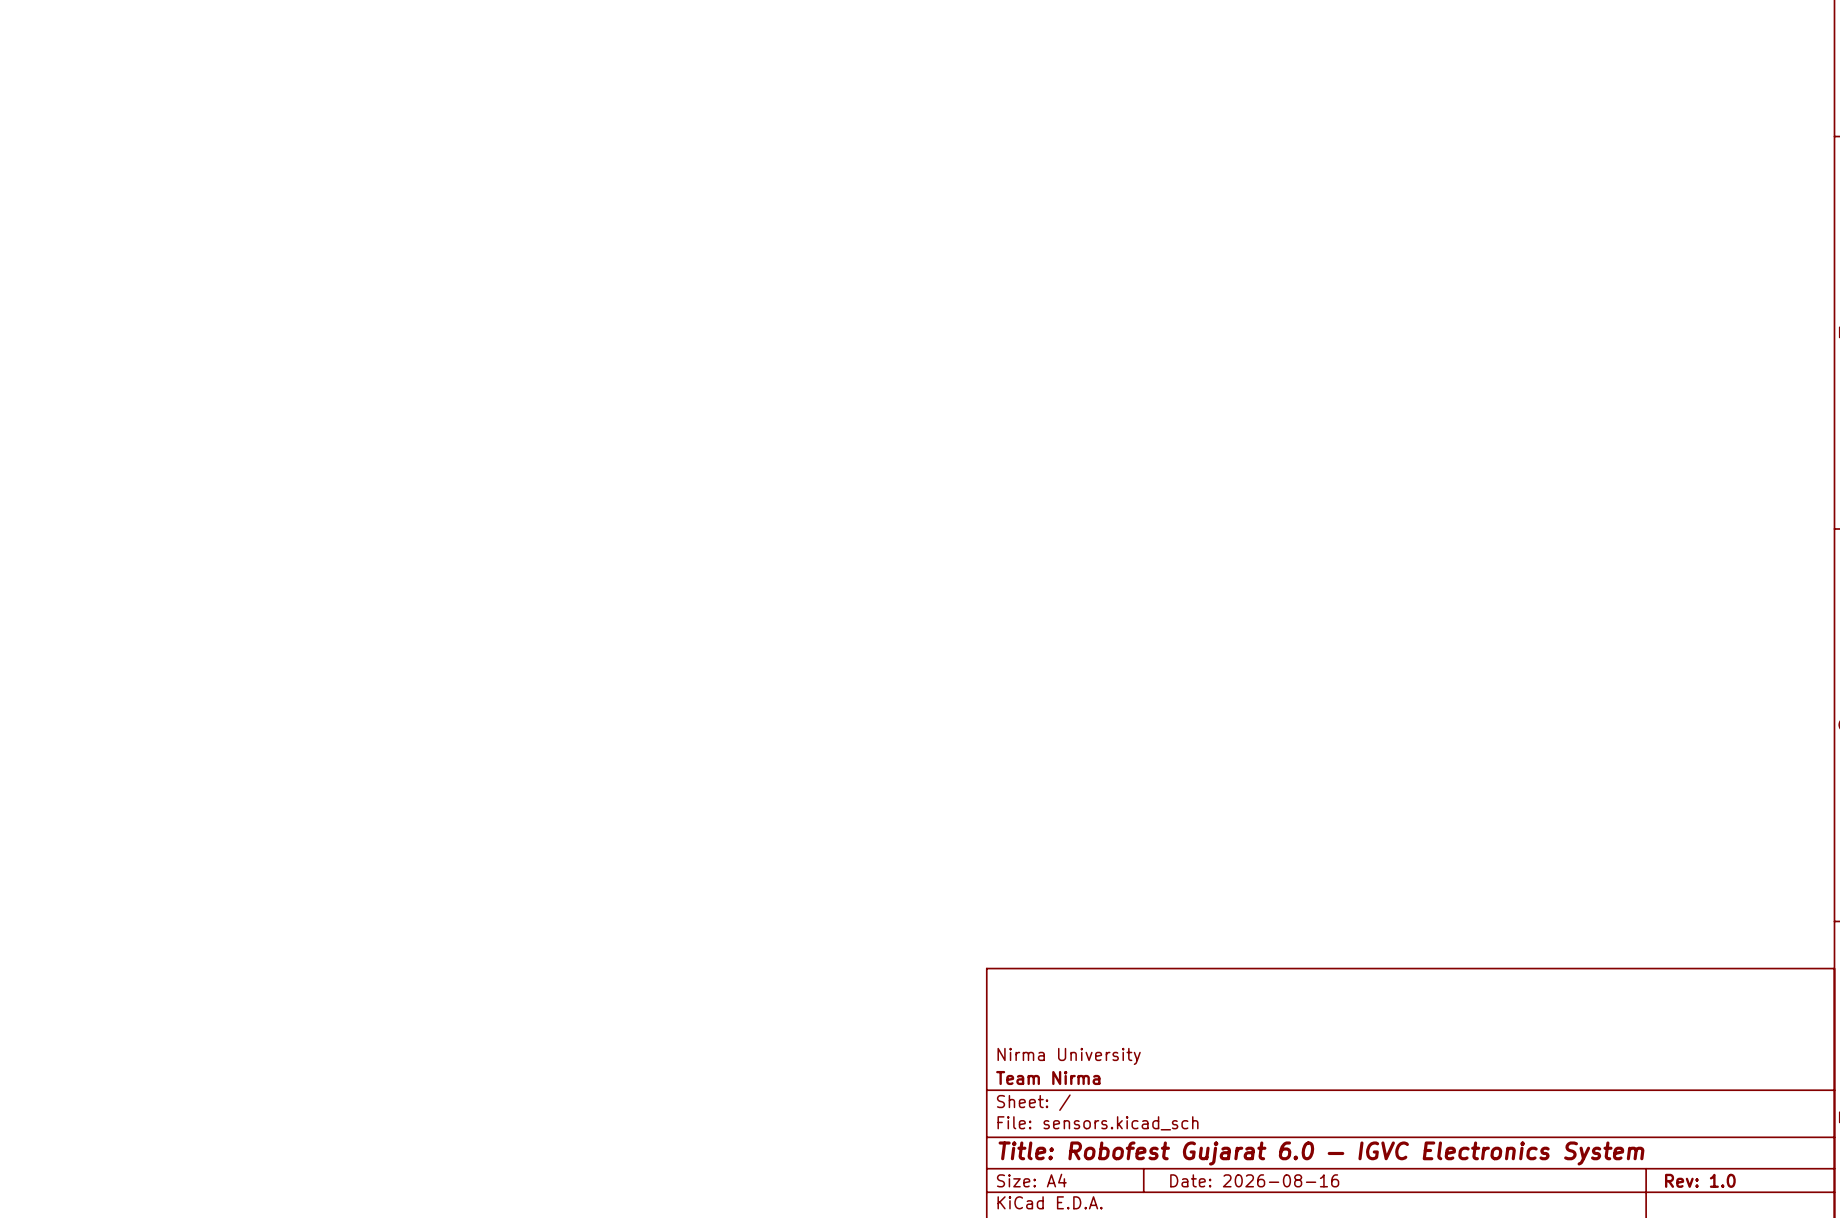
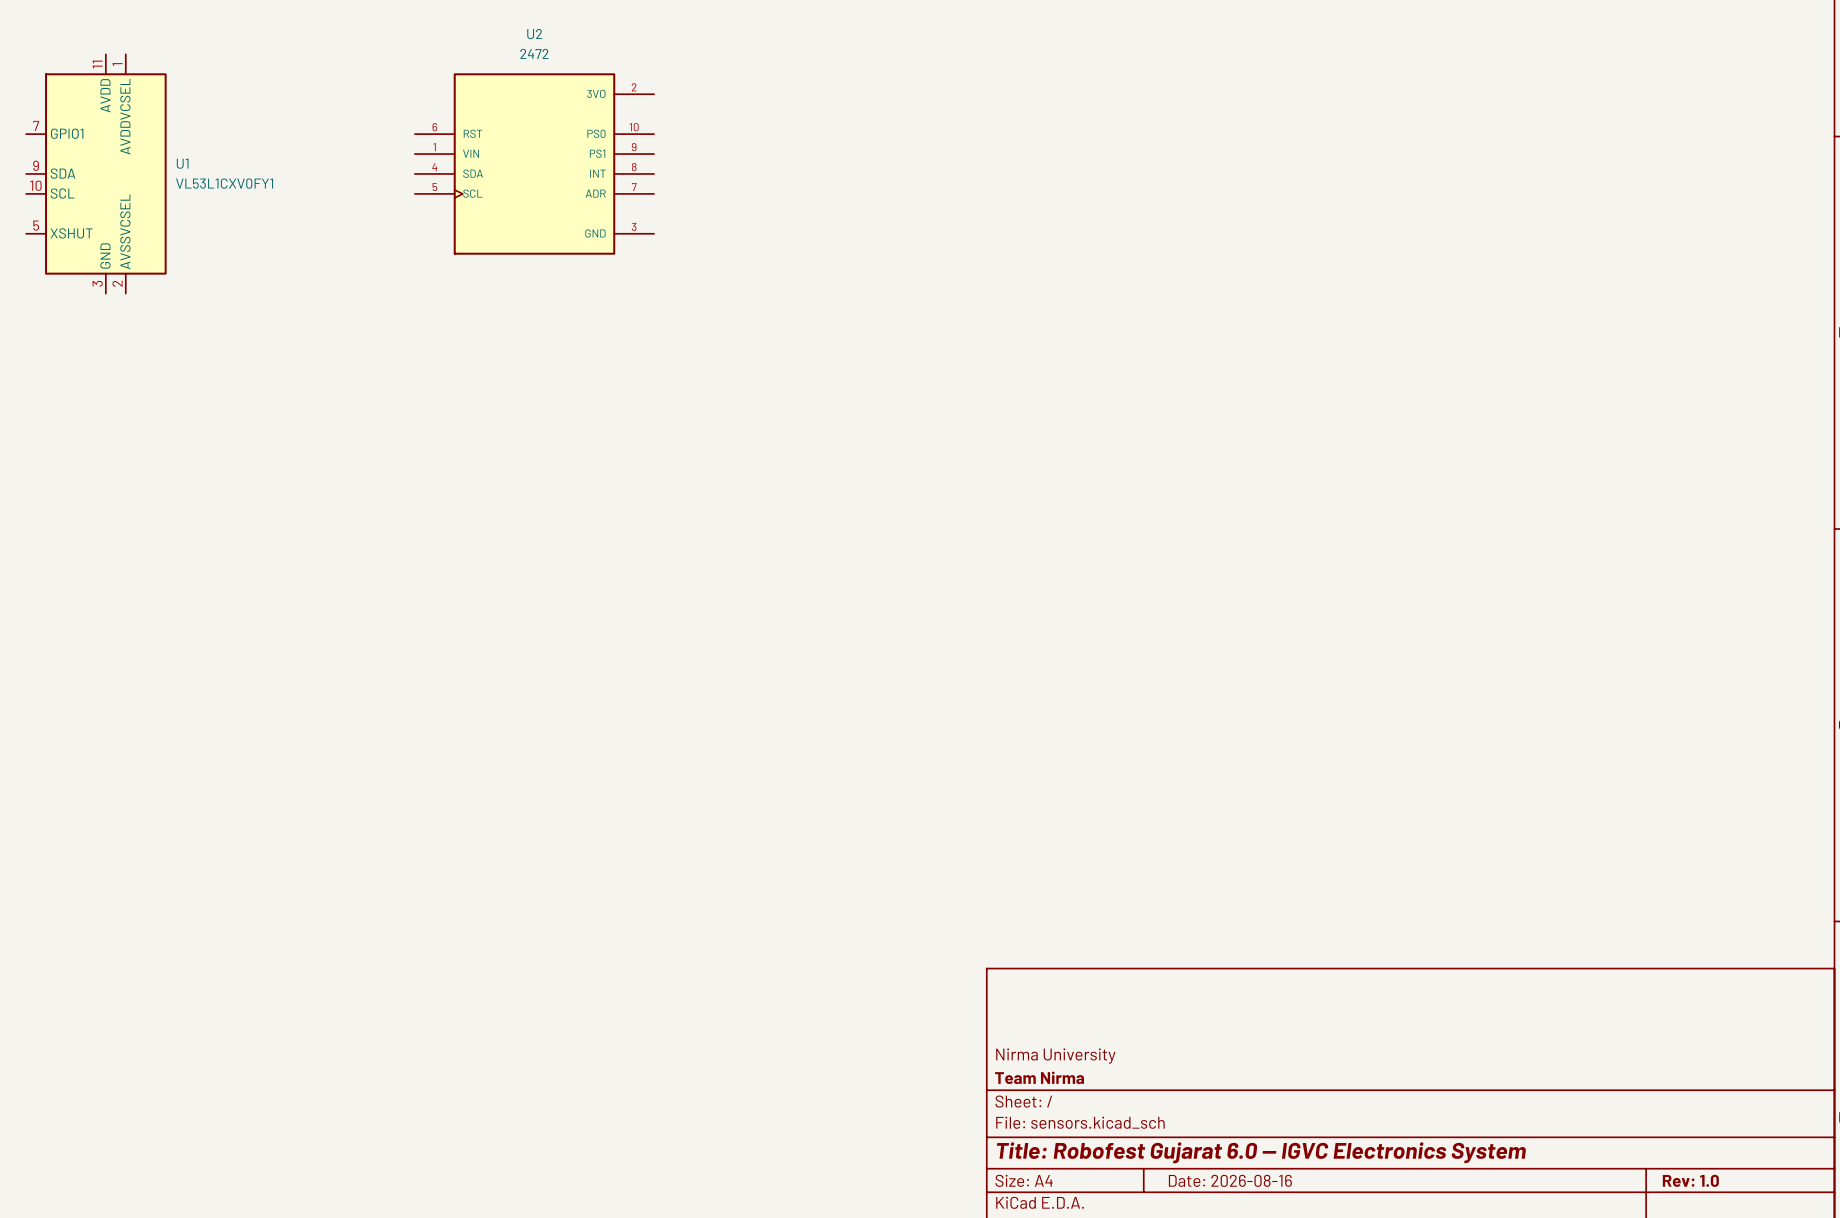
U2: none -> 2472 (534, 164)
U1: none -> VL53L1CXV0FY1 (96, 173)

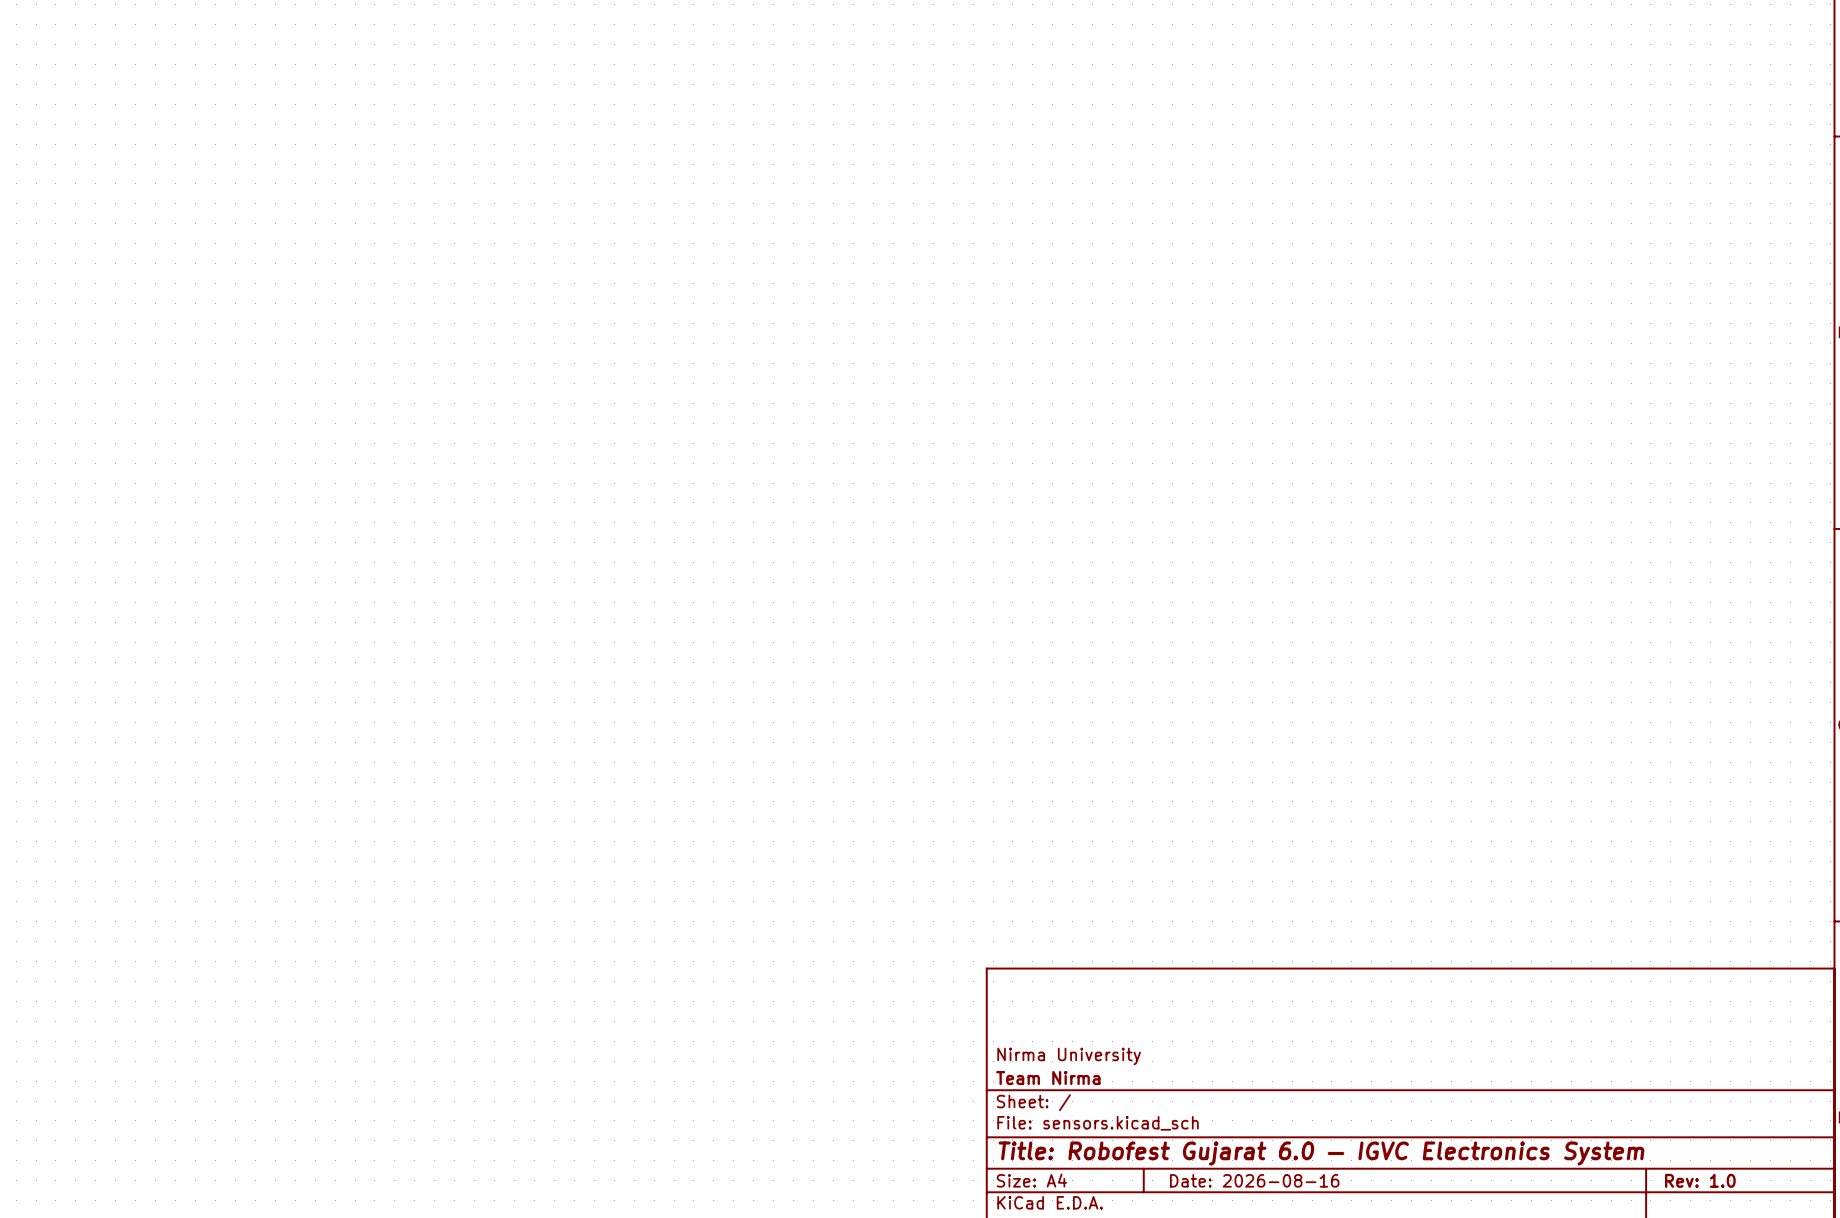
U2: 2472 (534, 164) -> none
U1: VL53L1CXV0FY1 (96, 173) -> none

